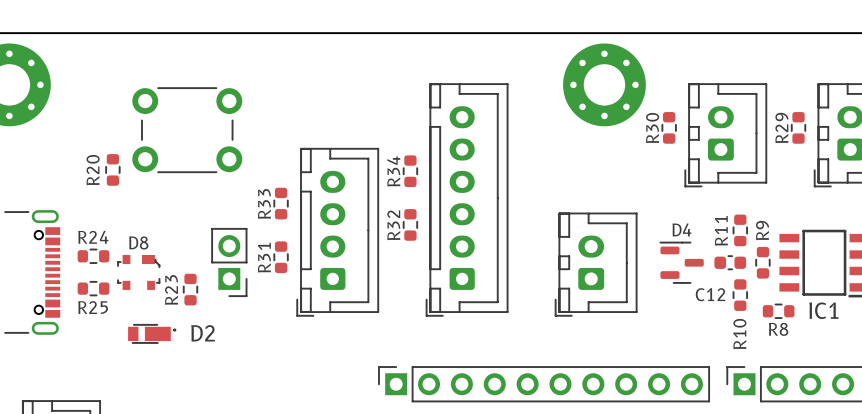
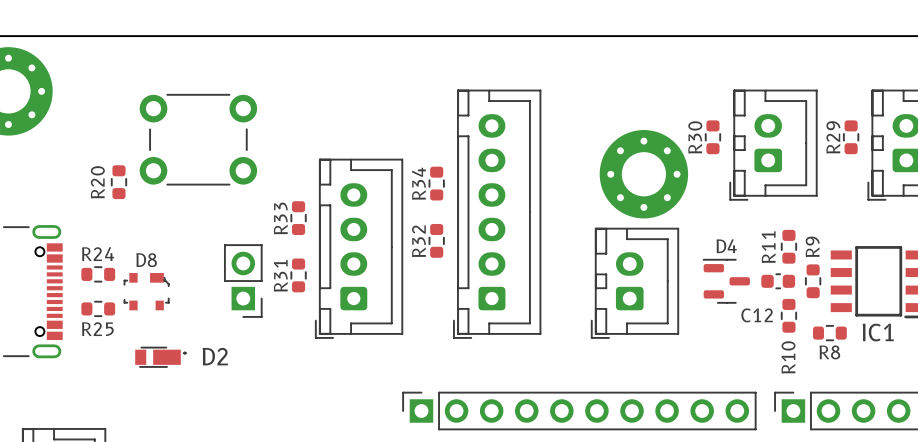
part position: (604, 84) -> (643, 174)
R23: (190, 289) -> none

